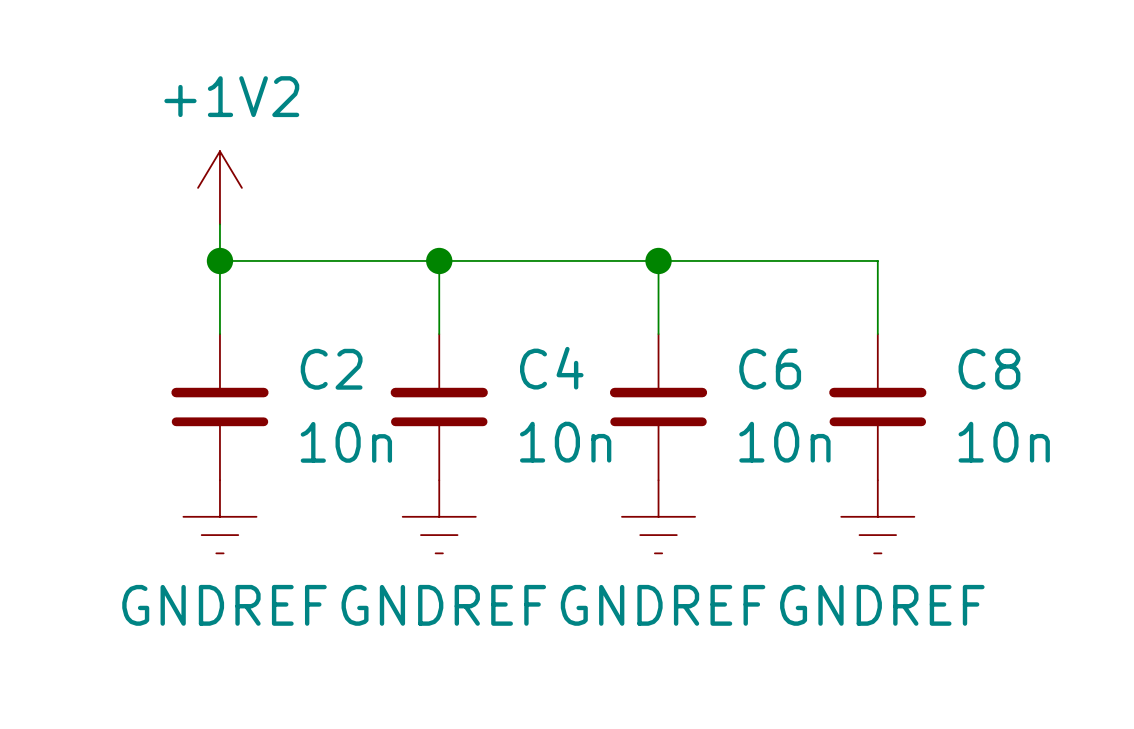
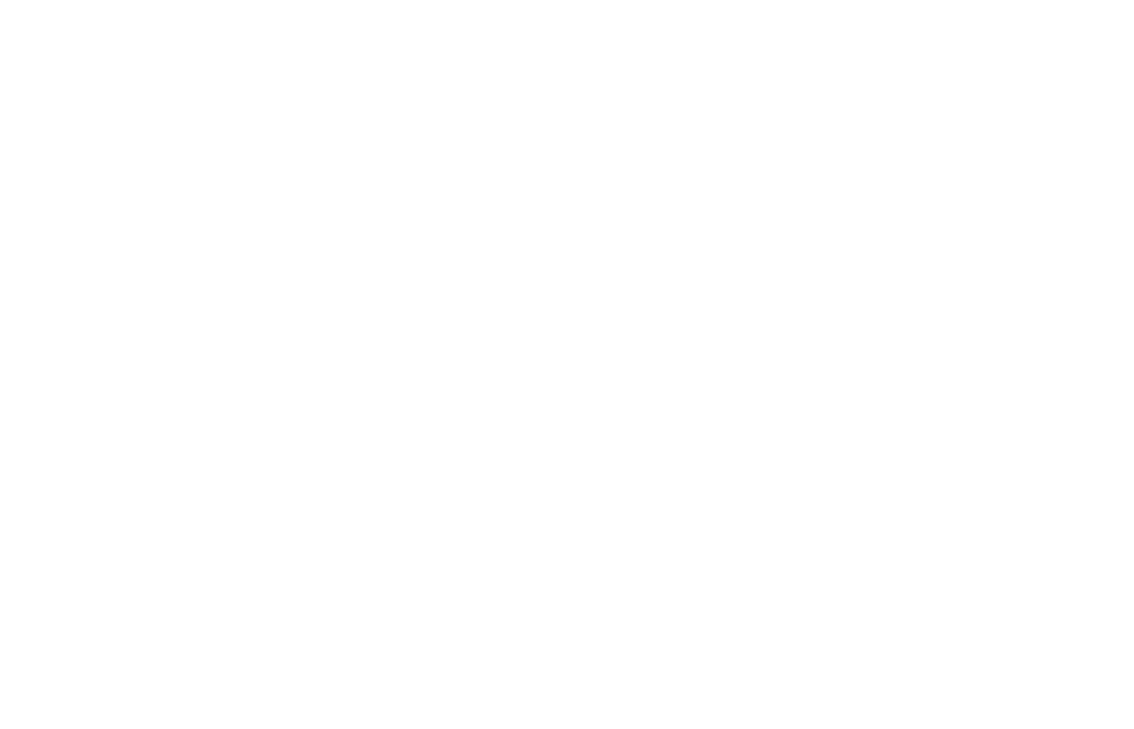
power symbol: +1V2 (219, 187) -> none
wire: (219, 224) (219, 334) -> none
wire: (219, 260) (877, 260) (877, 334) -> none
junction: (219, 260) -> none
wire: (439, 260) (439, 334) -> none
junction: (439, 260) -> none
wire: (658, 260) (658, 334) -> none
junction: (658, 260) -> none
C2: (219, 407) -> none
C4: (439, 407) -> none
C6: (658, 407) -> none
C8: (877, 407) -> none
power symbol: GNDREF (219, 516) -> none
power symbol: GNDREF (439, 516) -> none
power symbol: GNDREF (658, 516) -> none
power symbol: GNDREF (877, 516) -> none

